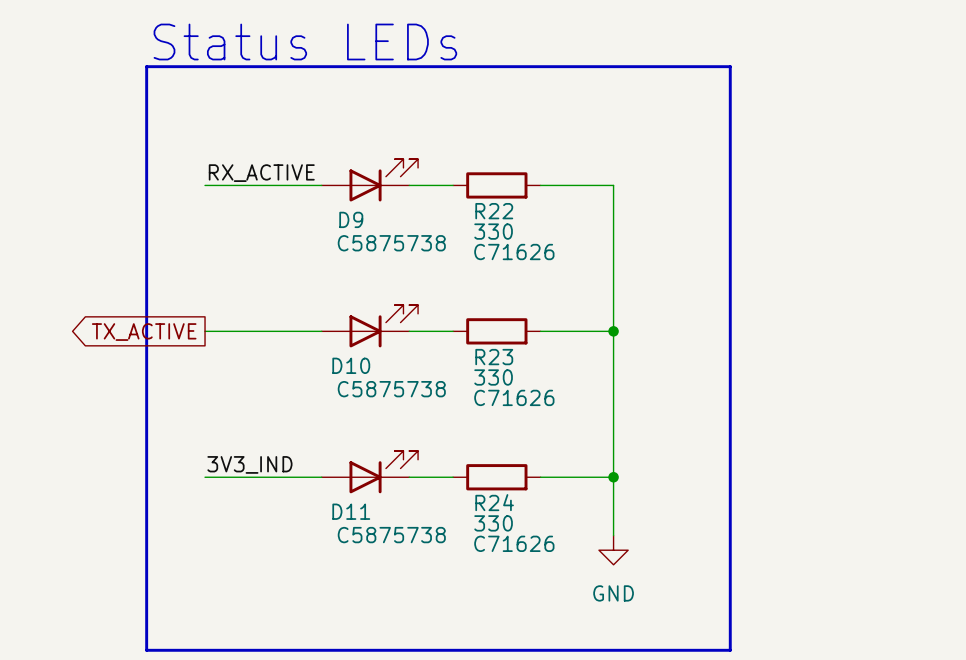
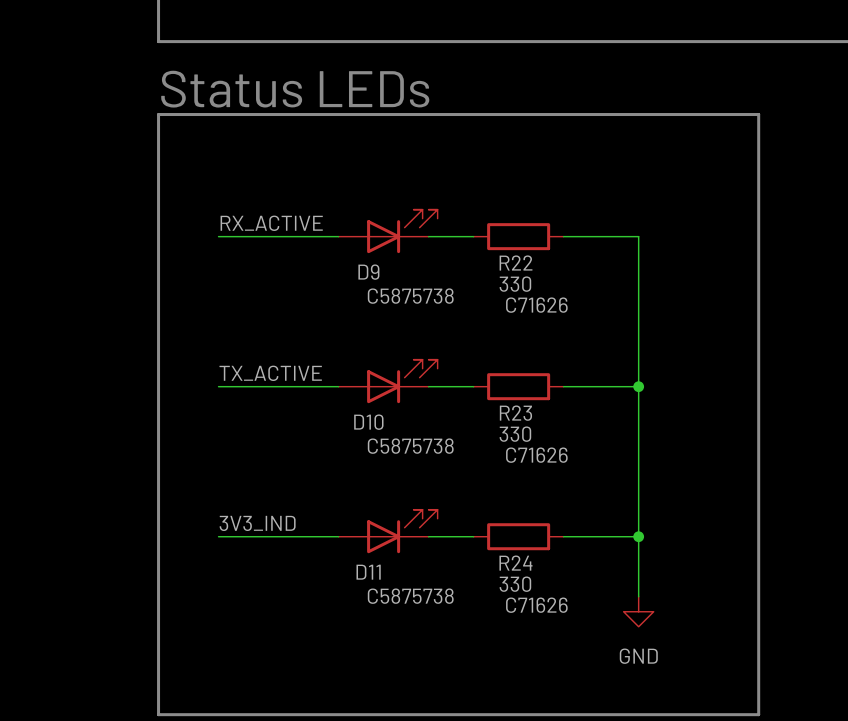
label: none -> TX_ACTIVE (270, 373)
global label: TX_ACTIVE (144, 332) -> none

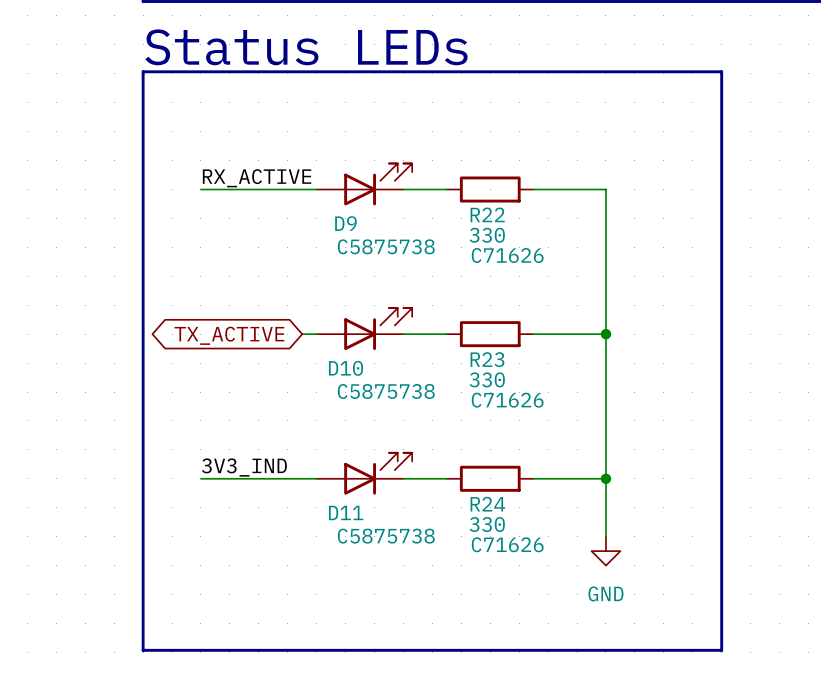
label: TX_ACTIVE (270, 373) -> none
wire: (218, 386) (323, 386) -> none
global label: none -> TX_ACTIVE (229, 335)

